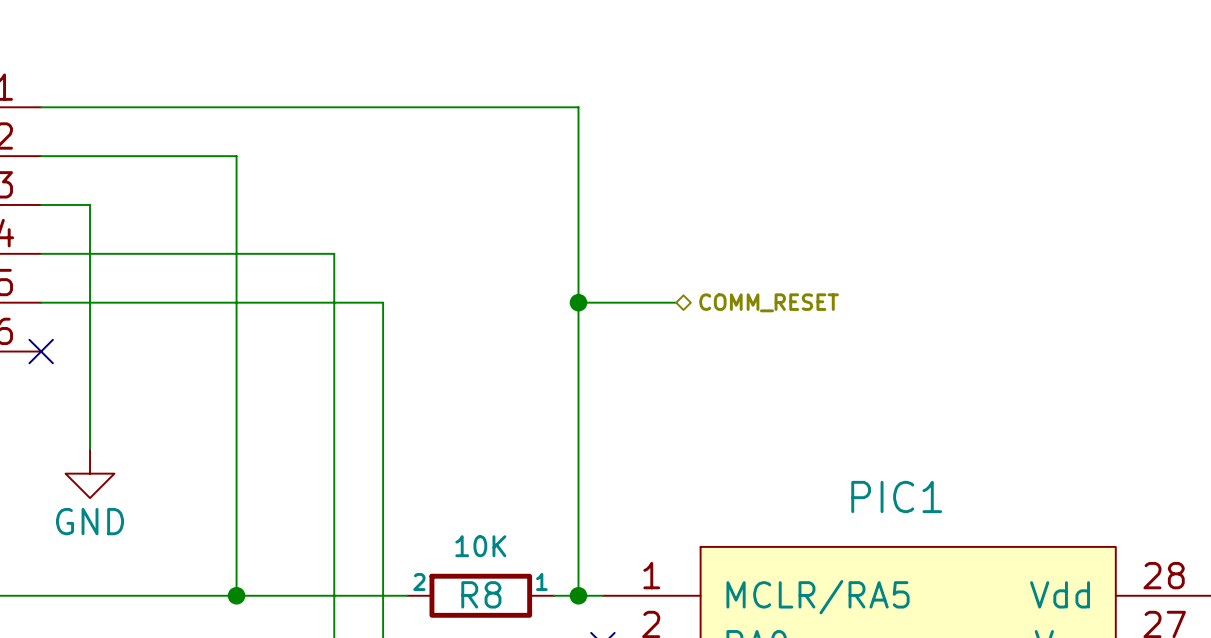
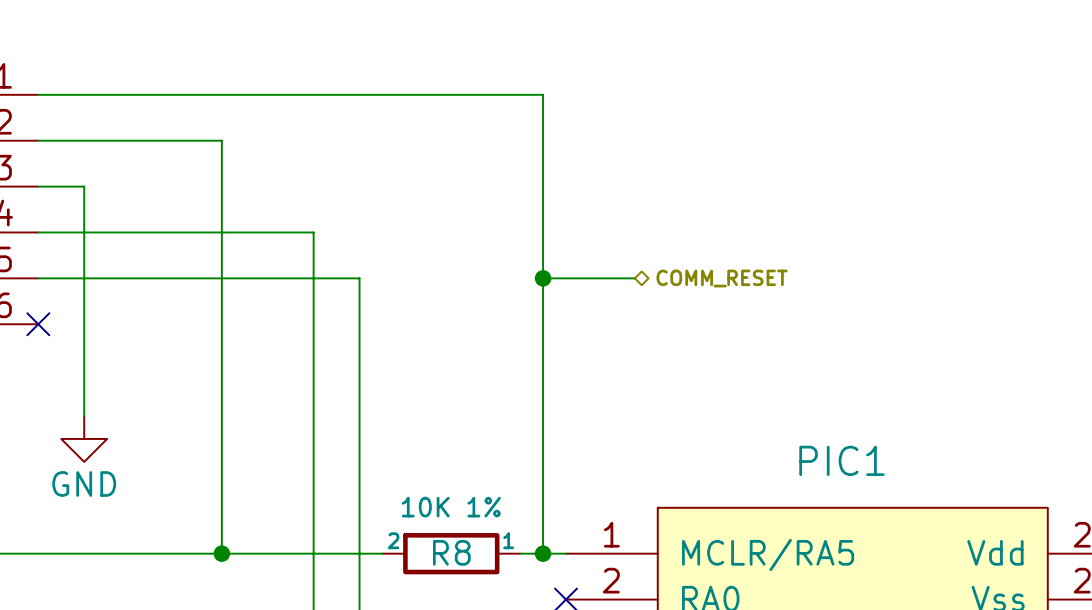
R8 value: 10K (480, 546) -> 10K 1% (451, 507)

